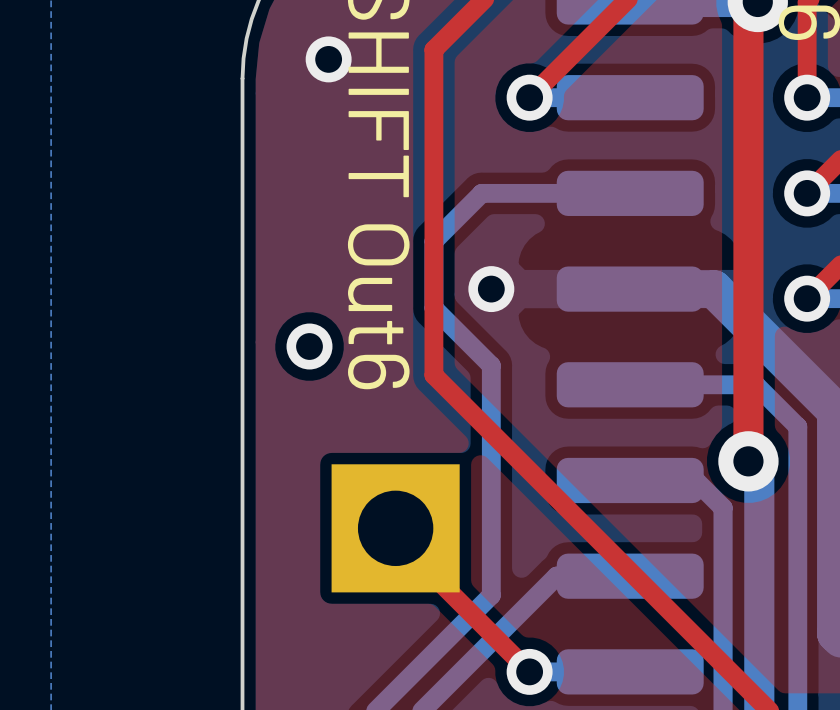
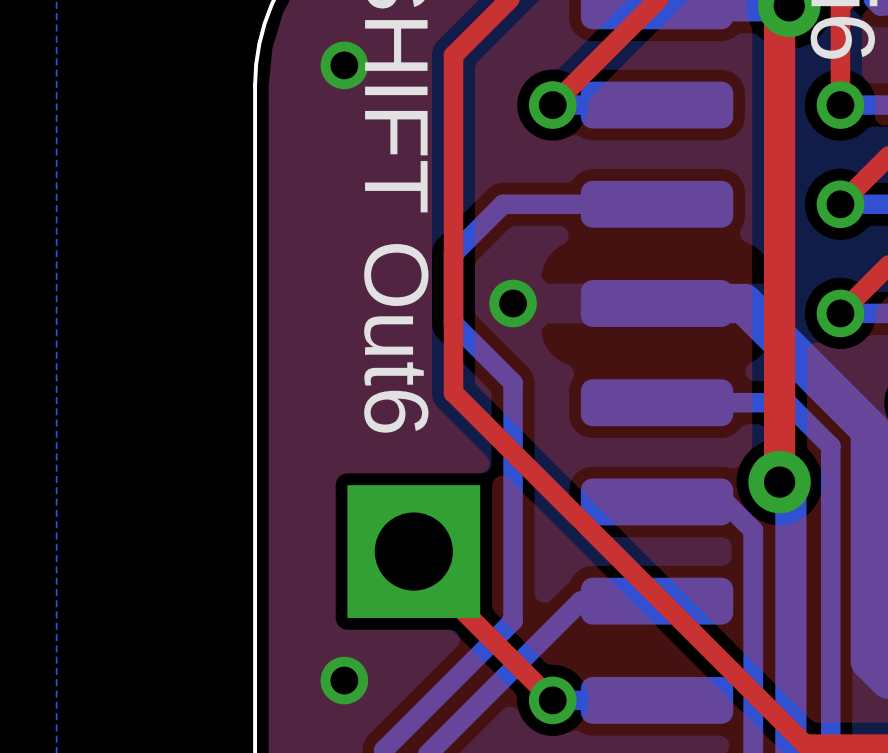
via position: (309, 346) -> (344, 680)

